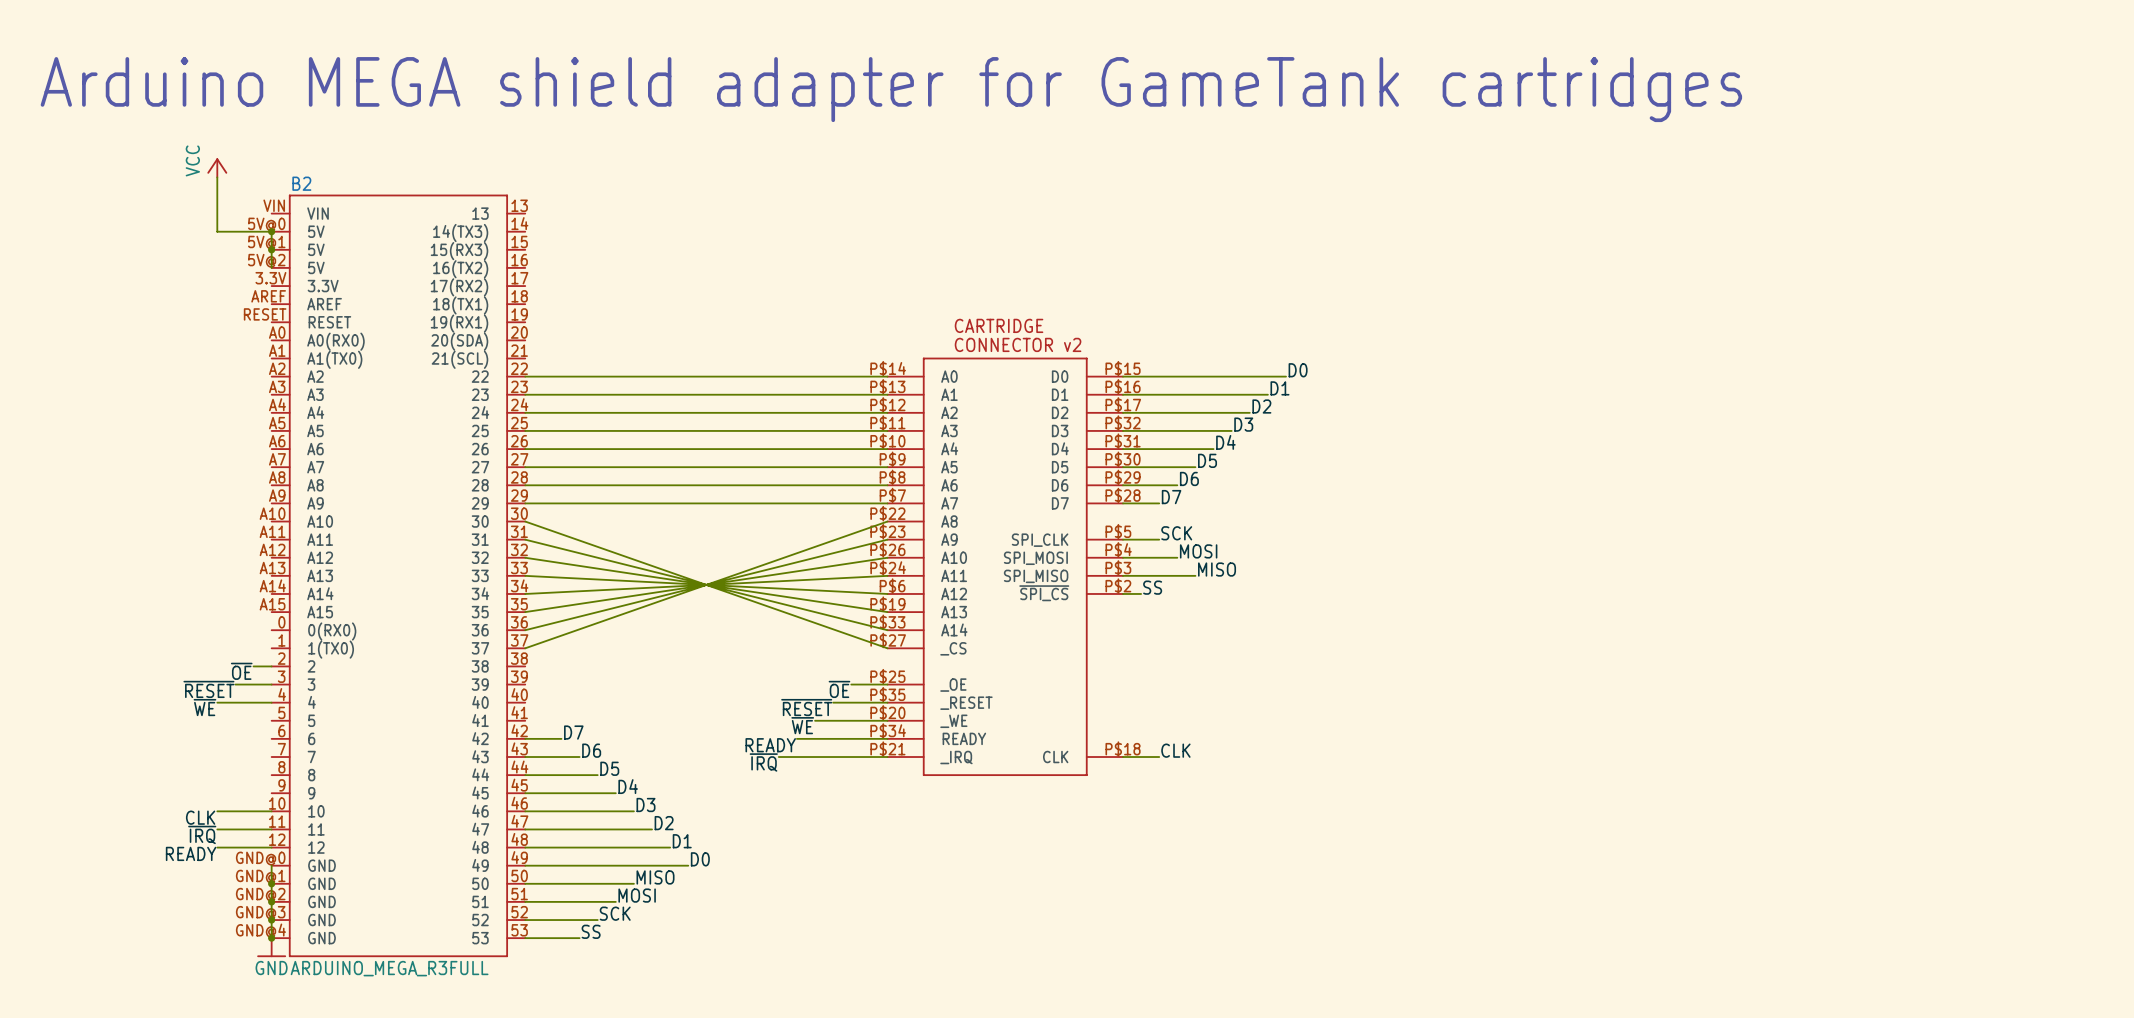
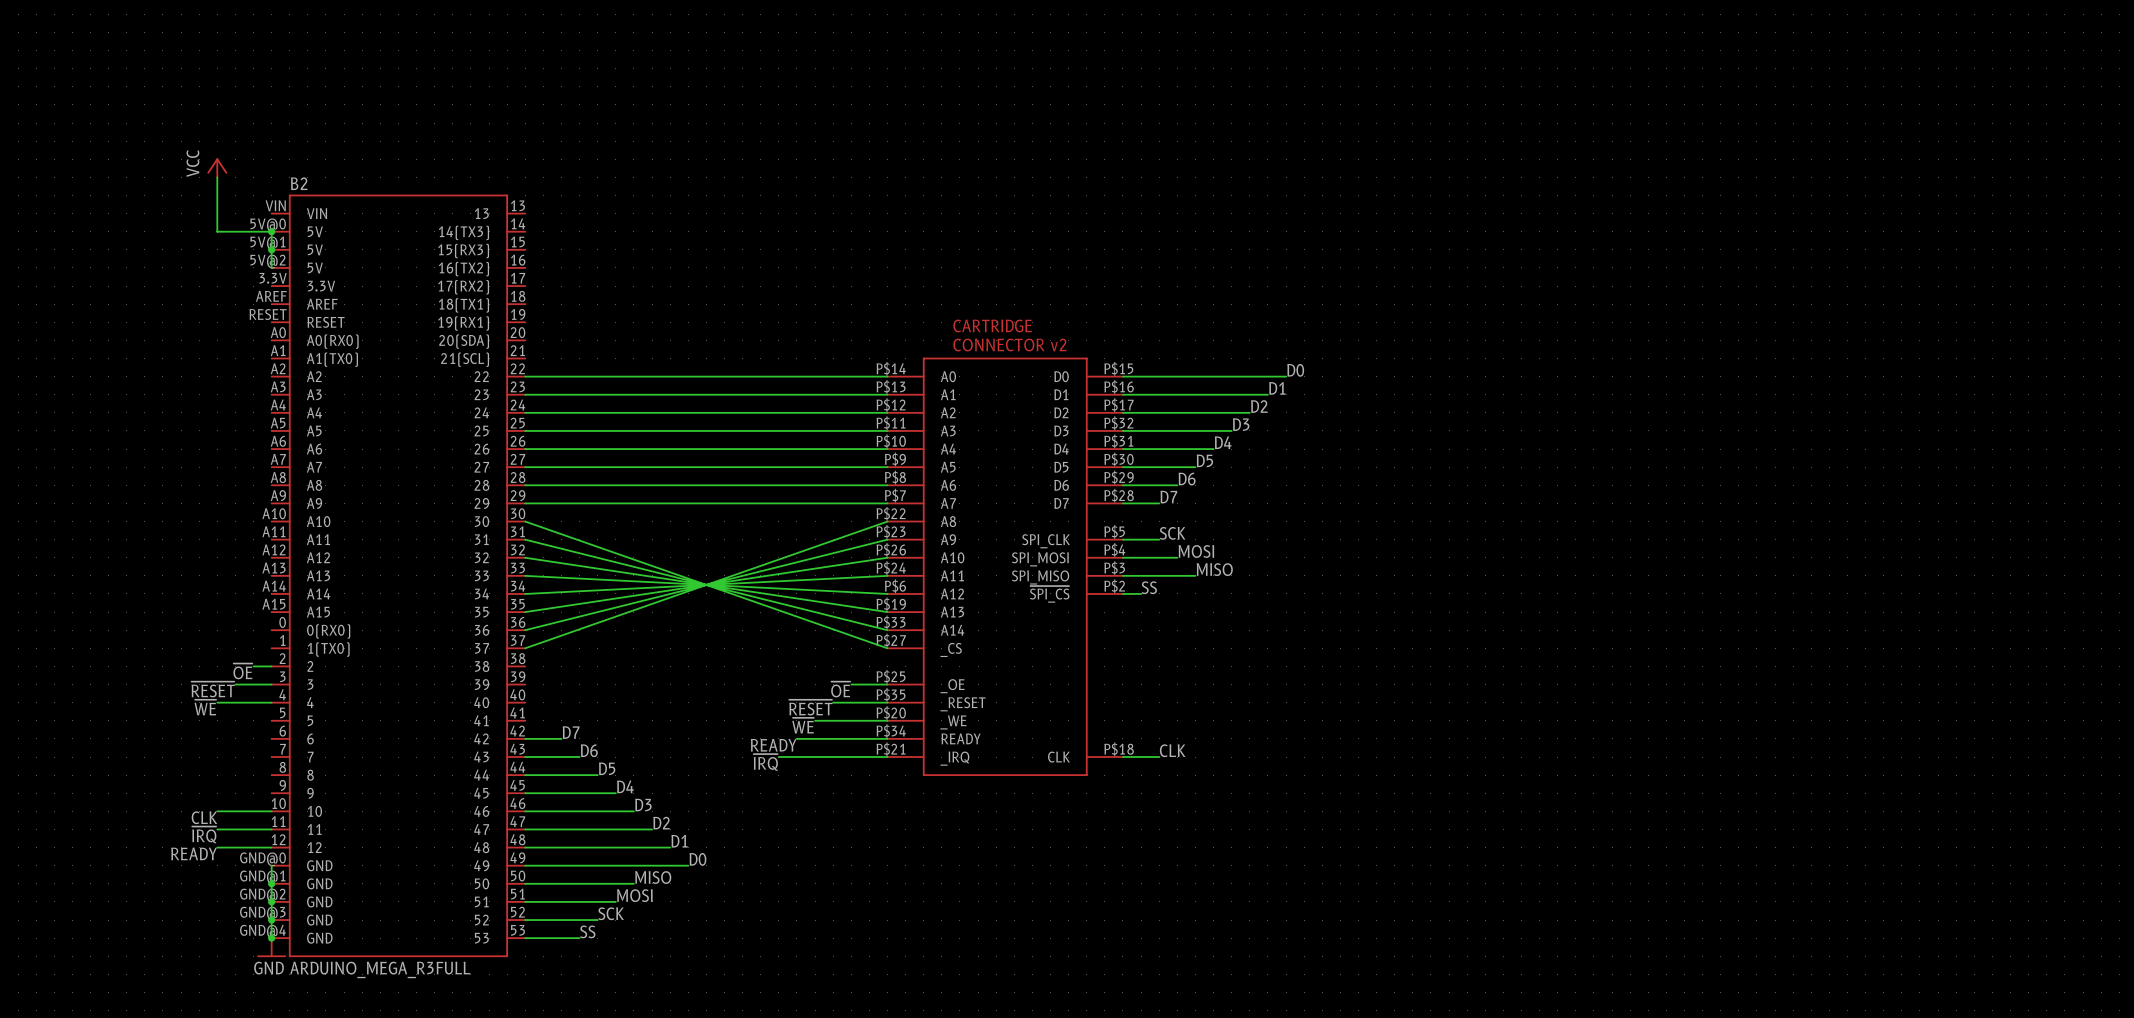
text: Arduino MEGA shield adapter for GameTank cartridges (891, 89) -> none

